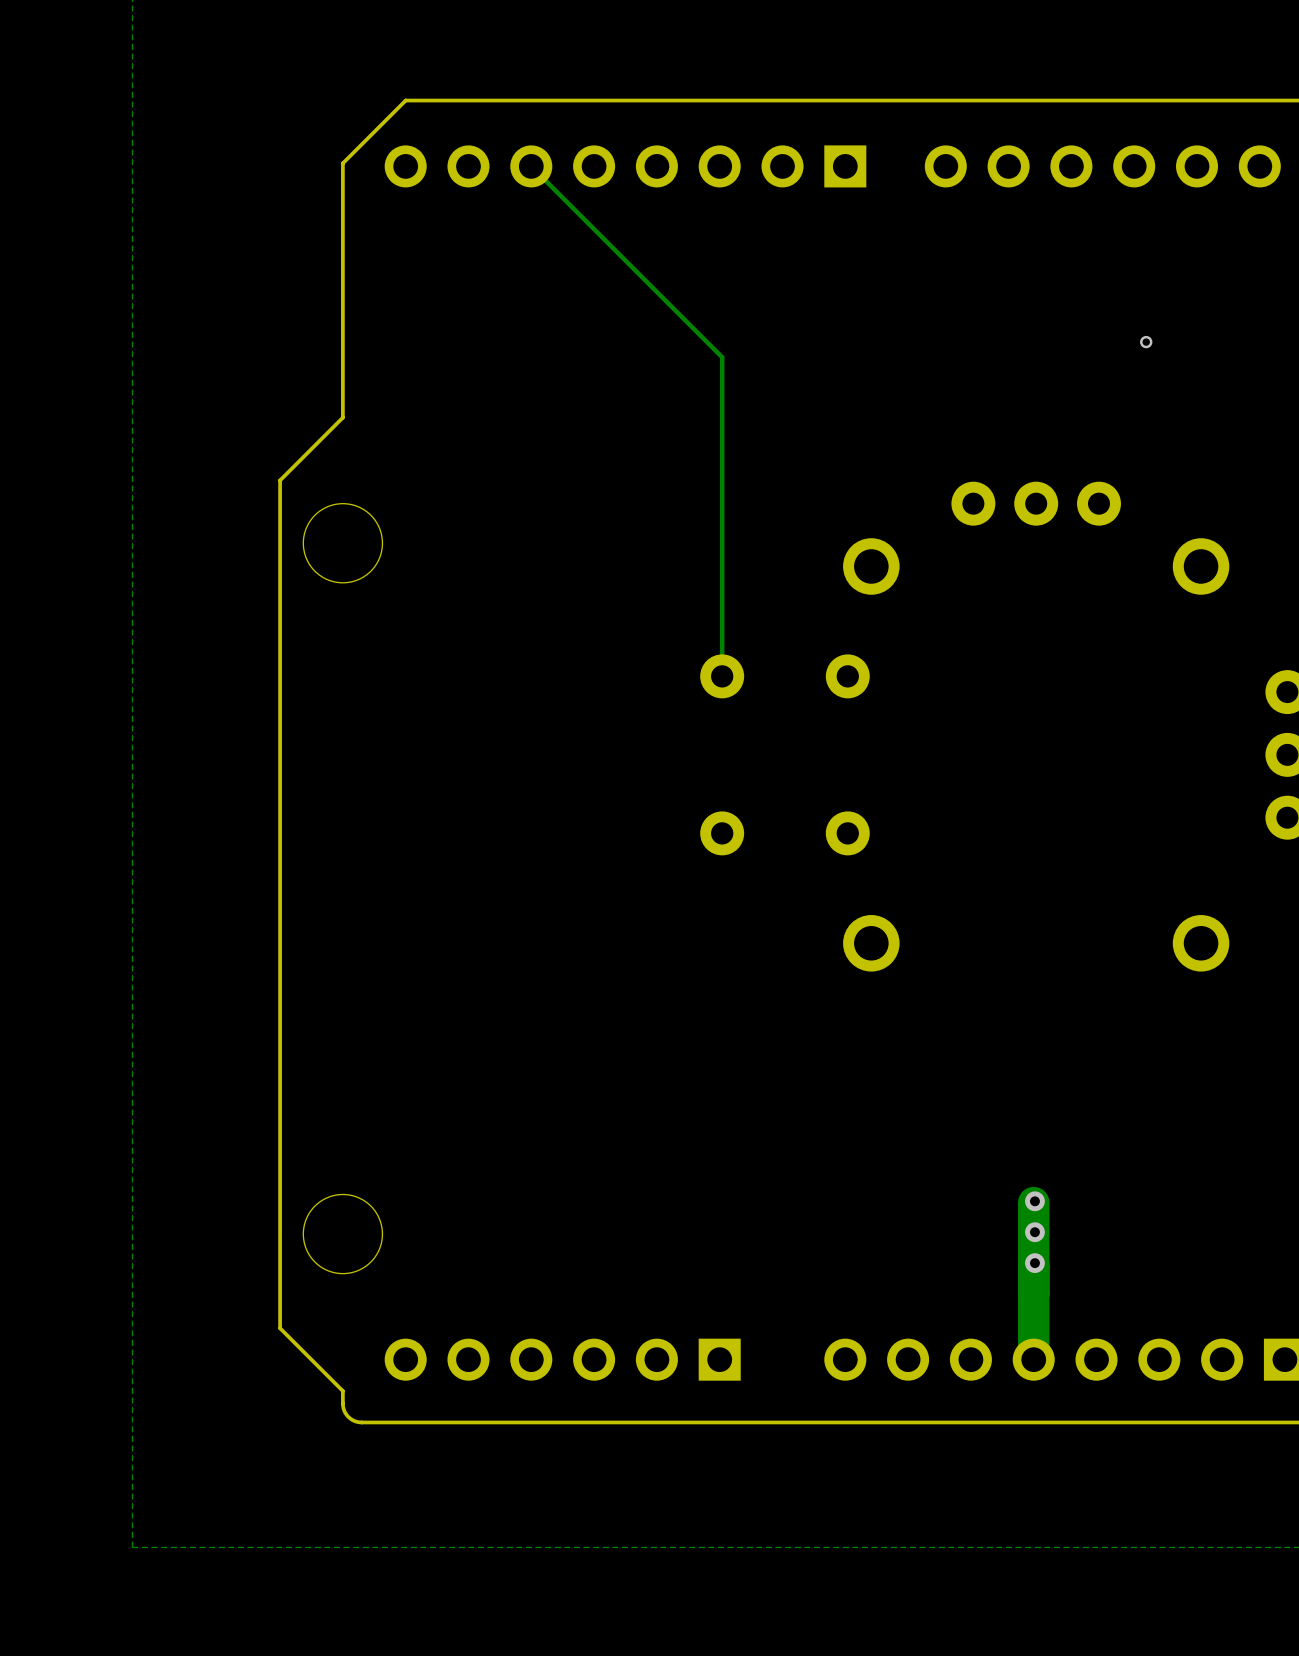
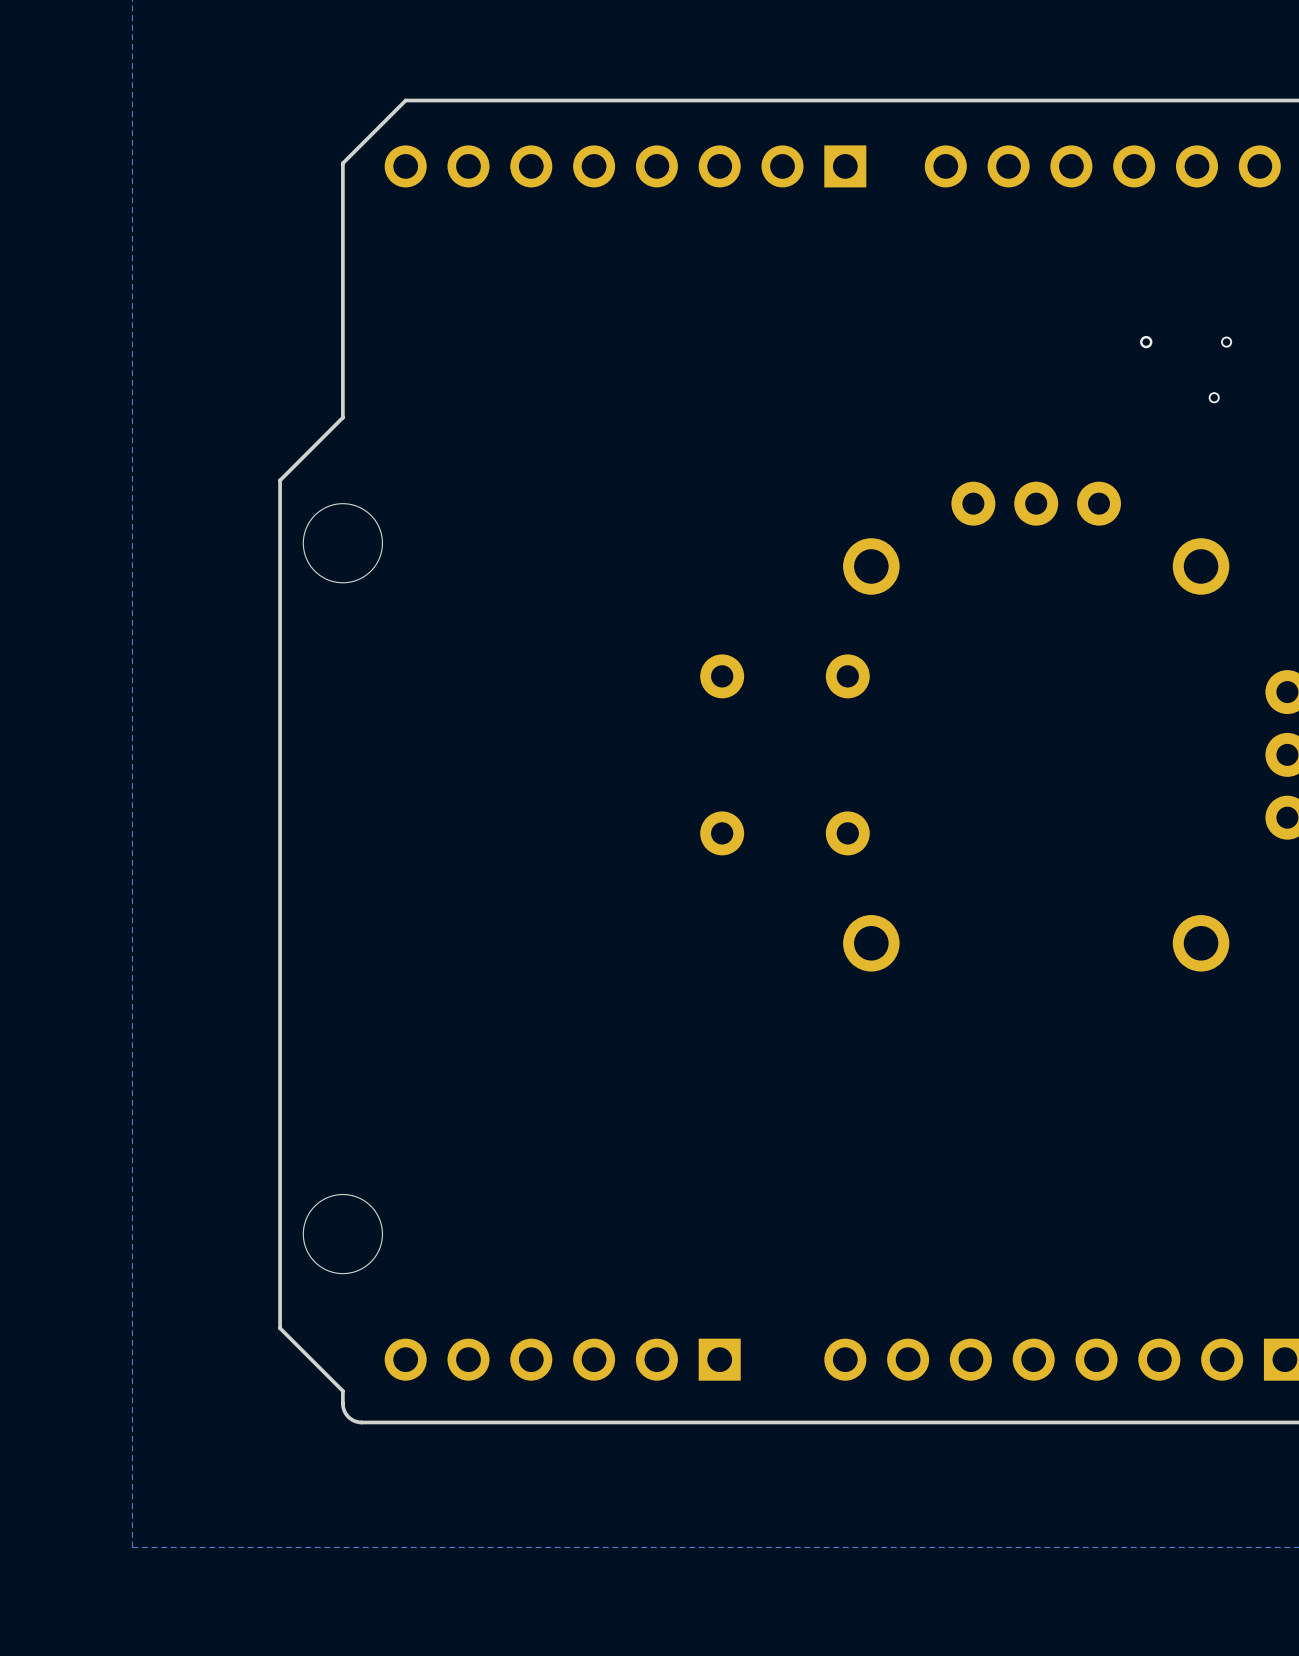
track: (531, 166) (722, 357) (722, 676) -> none
via: none -> (1226, 342)
via: none -> (1214, 397)
via: (1034, 1201) -> none
track: (1033, 1202) (1033, 1359) -> none
via: (1034, 1232) -> none
via: (1034, 1263) -> none

